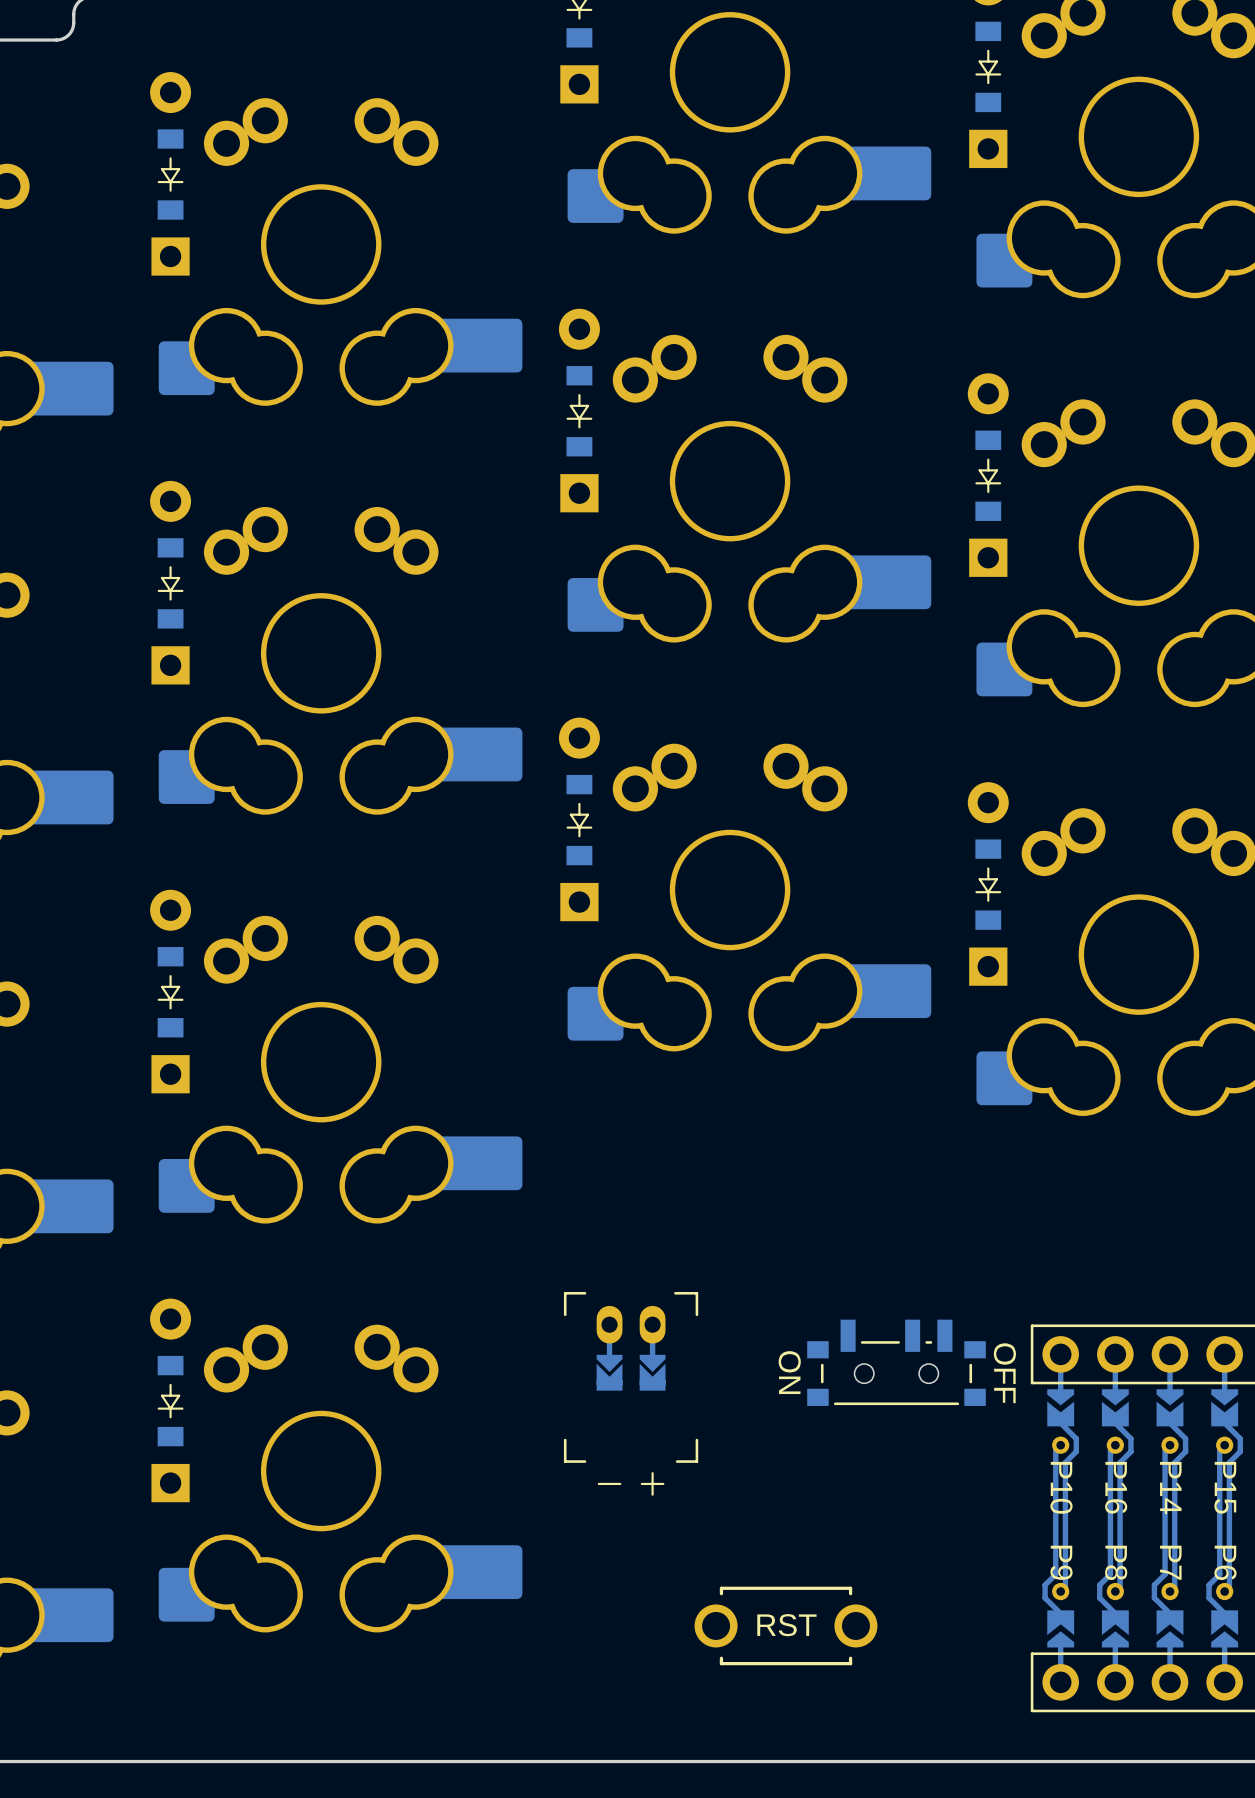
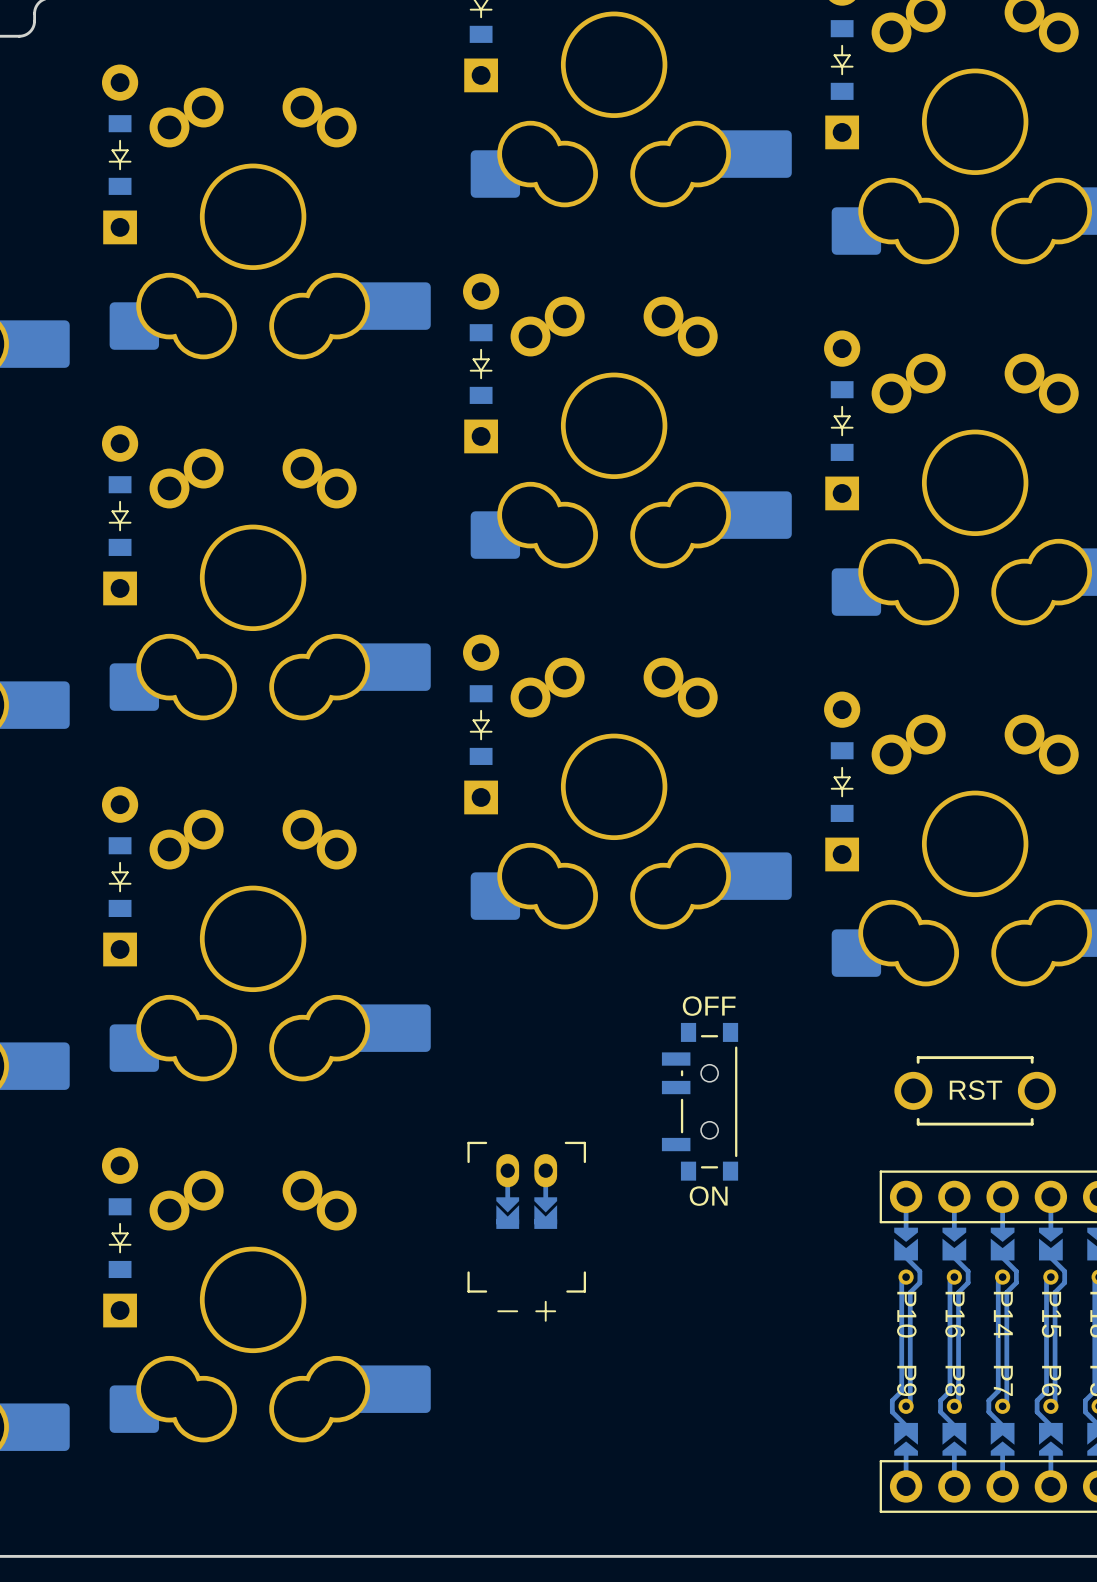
part rotation: 0° (896, 1362) -> 90° counterclockwise (700, 1101)
part position: (896, 1362) -> (700, 1101)
part position: (786, 1625) -> (975, 1090)

